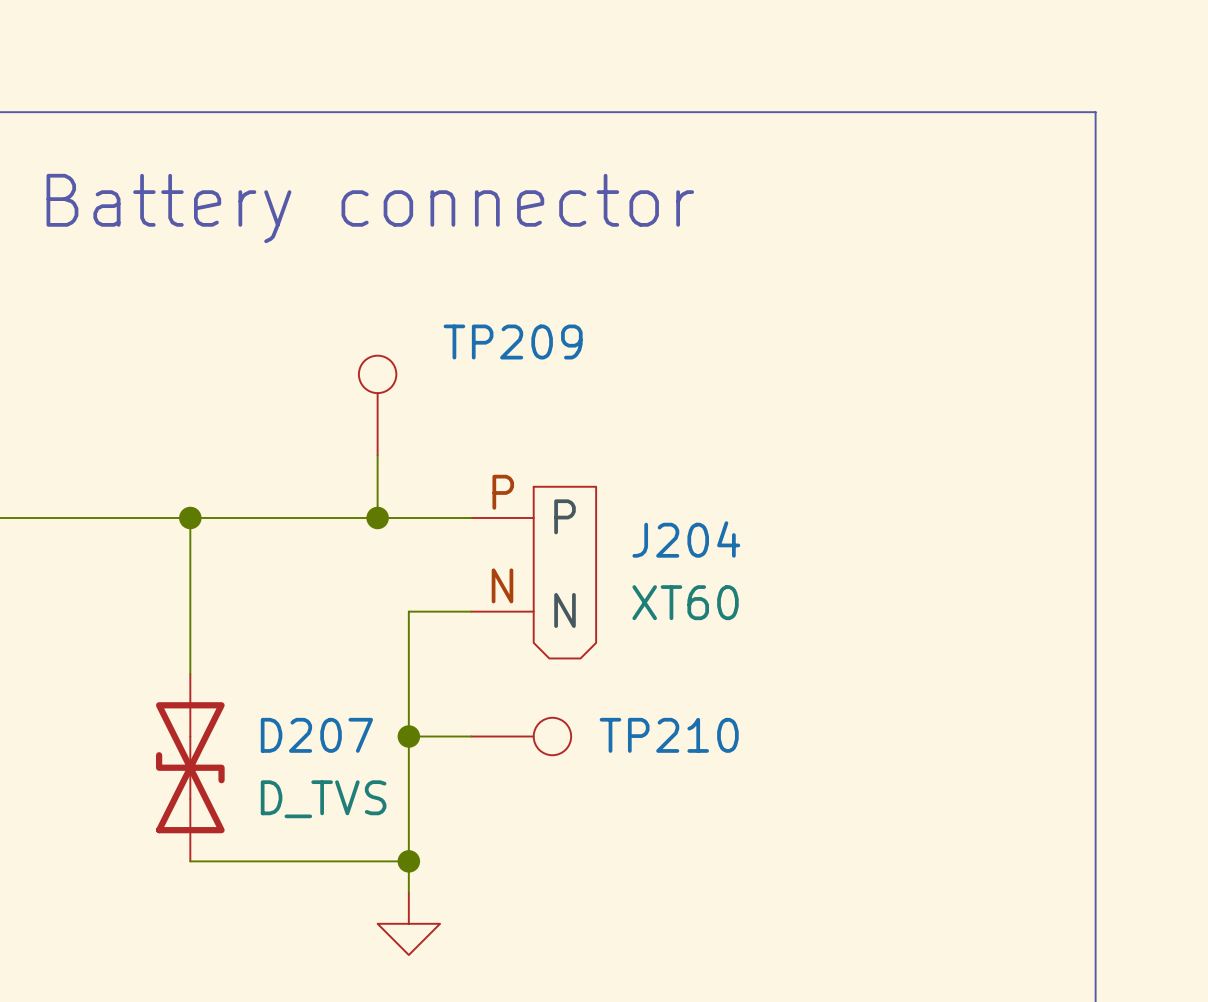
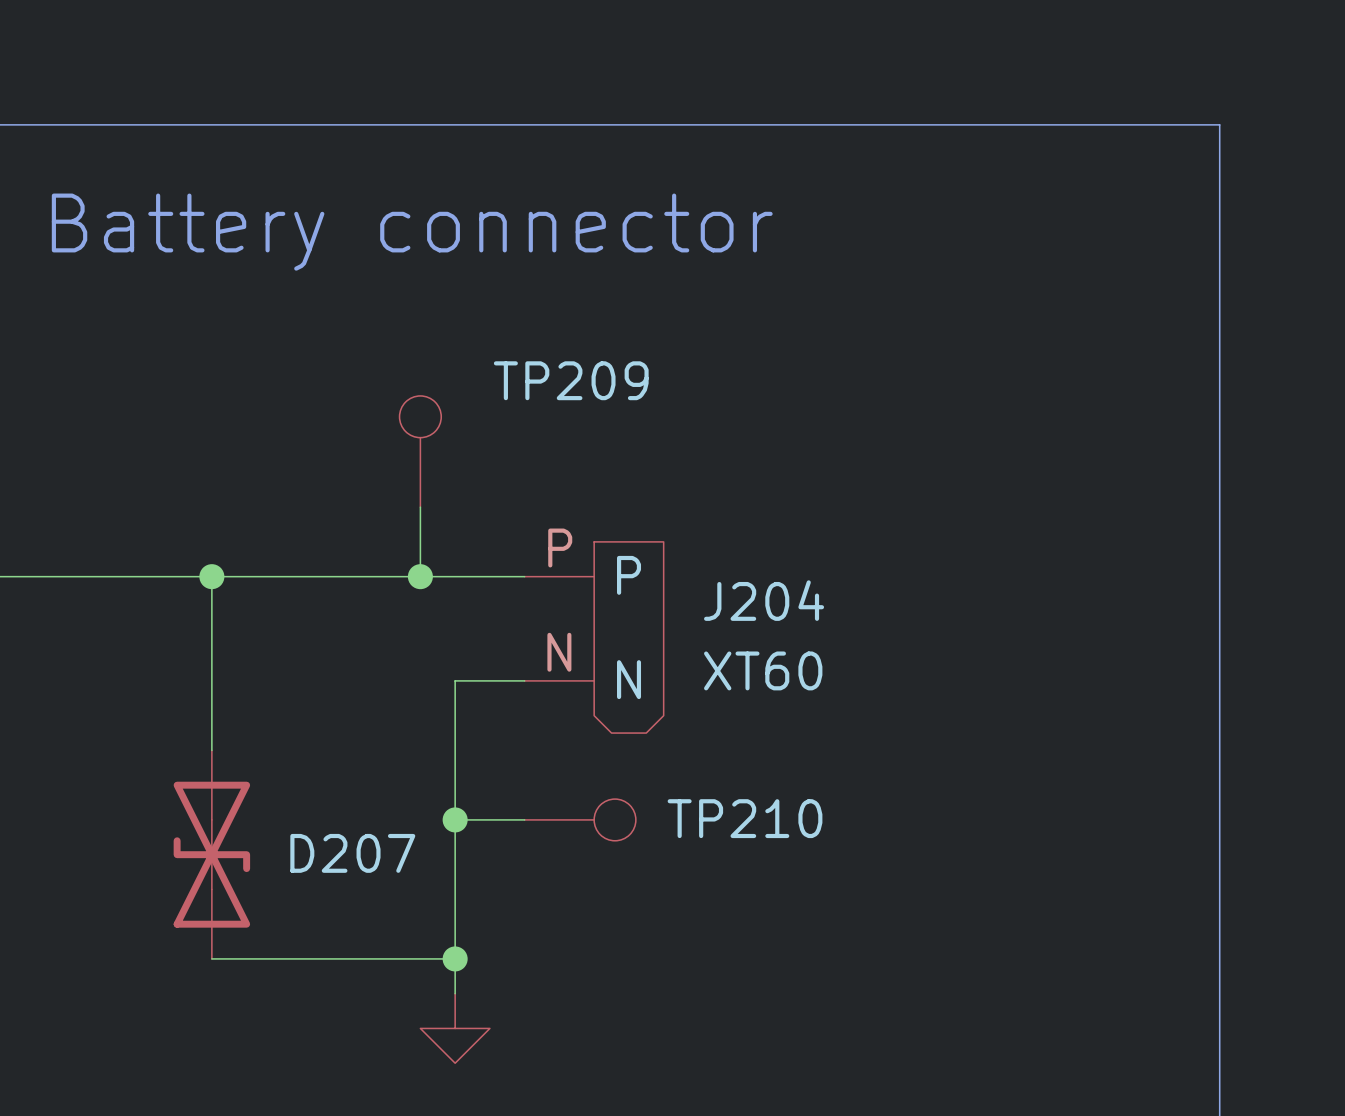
D207 name position: D207 (316, 735) -> D207 (352, 853)
D207 value: D_TVS (323, 799) -> none

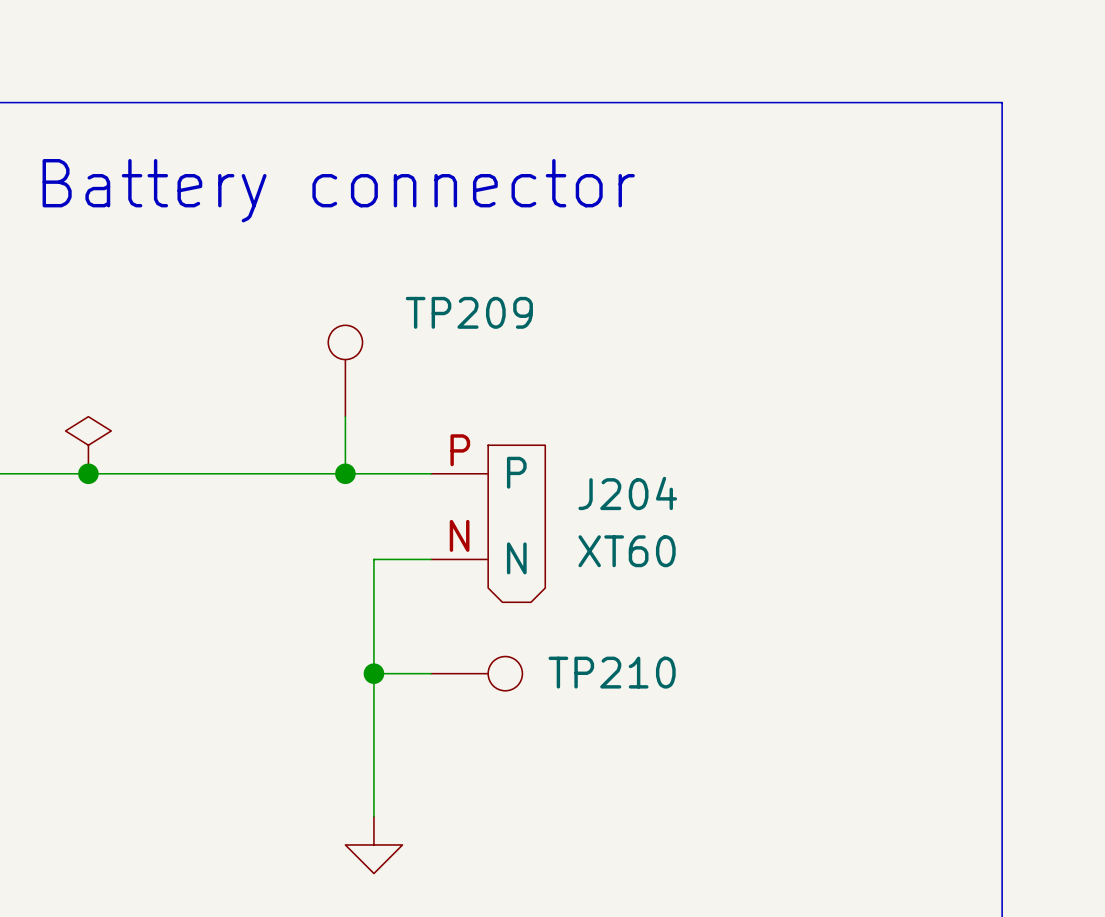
power symbol: none -> (88, 445)
wire: (211, 576) (211, 750) -> none
junction position: (211, 576) -> (88, 473)
D207: (211, 854) -> none
wire: (211, 958) (455, 958) -> none
junction: (455, 958) -> none

